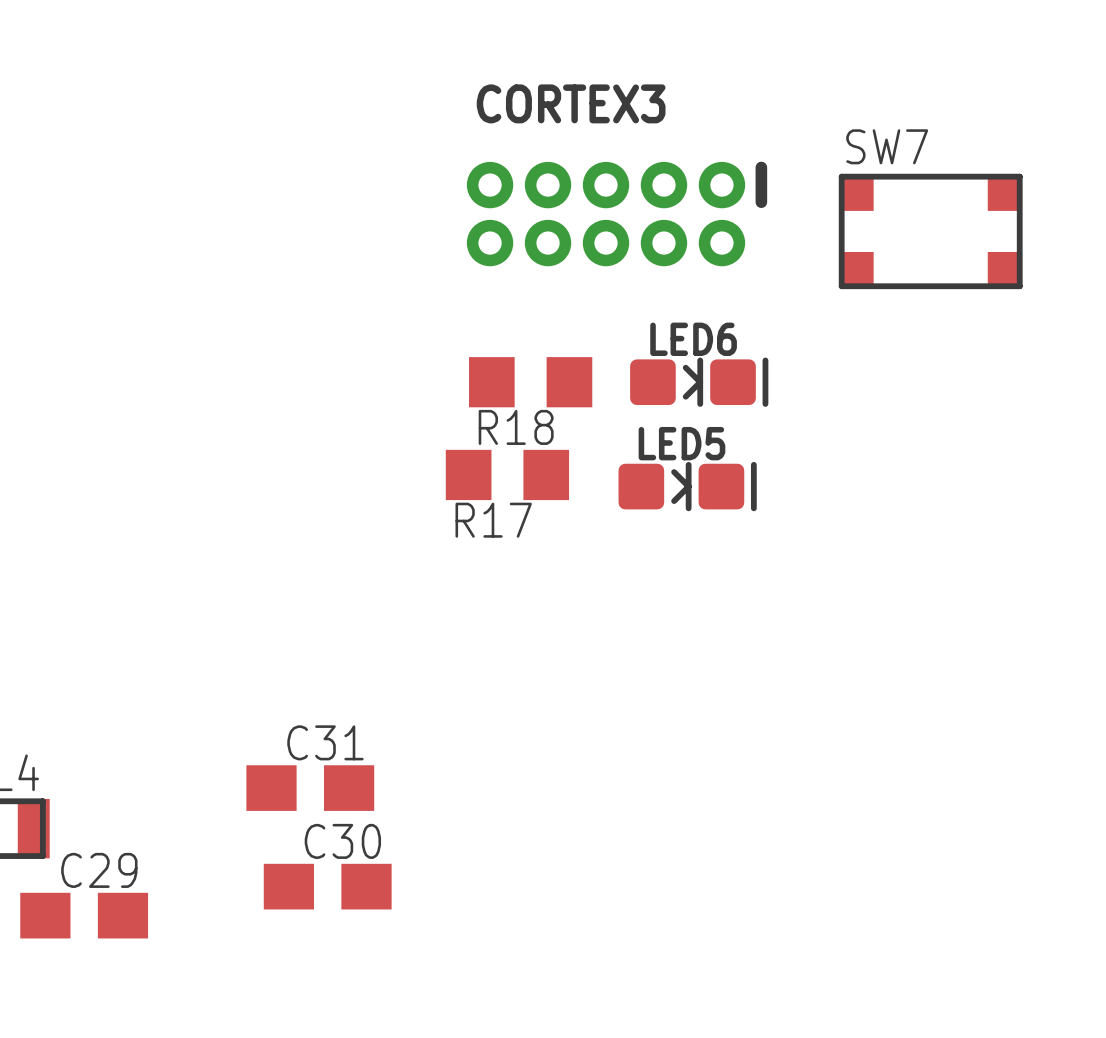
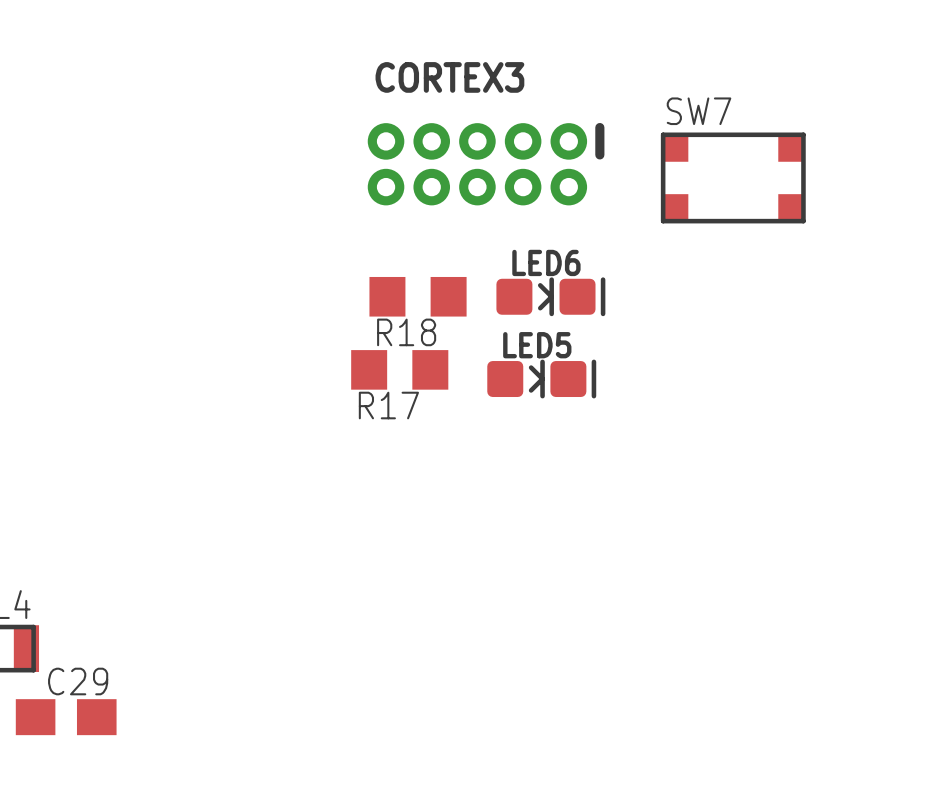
C31: (310, 788) -> none
C30: (327, 886) -> none

